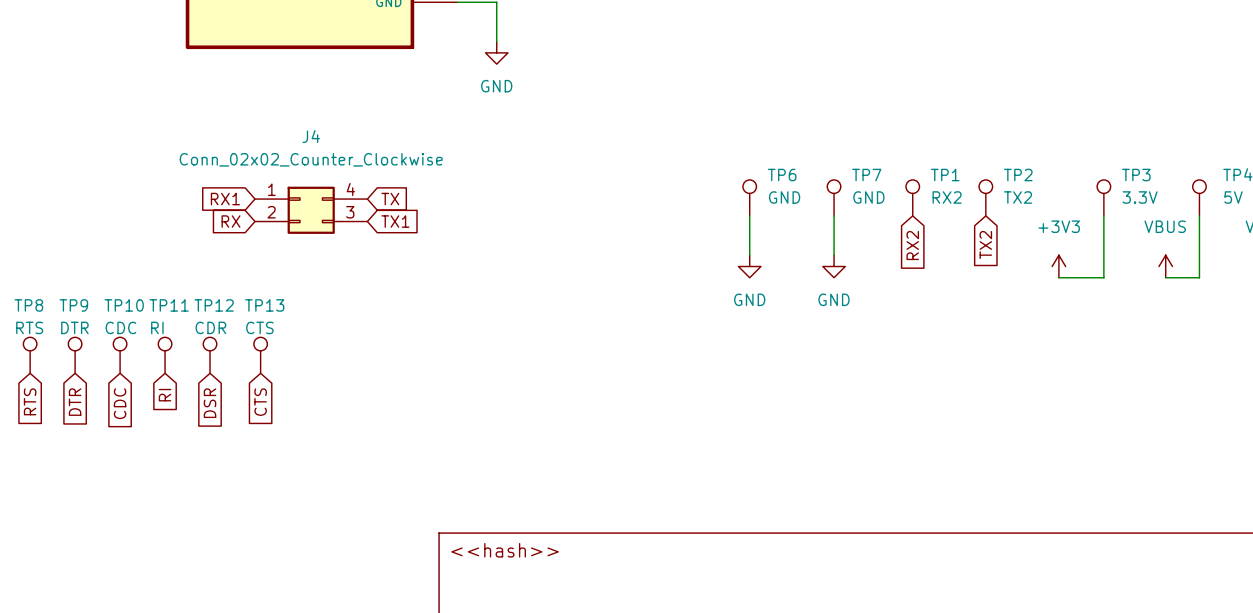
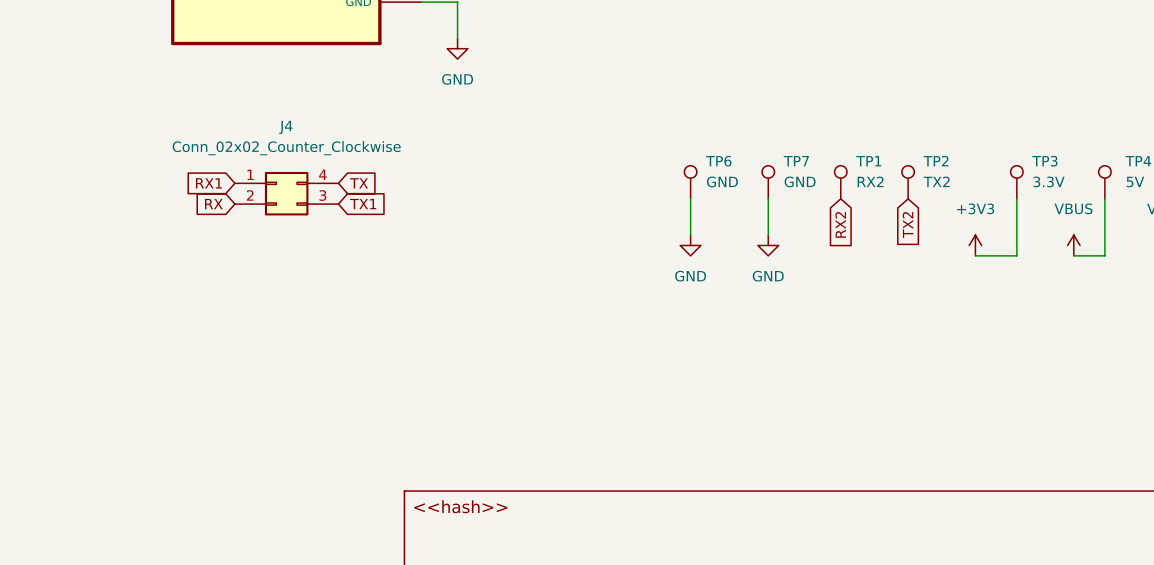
TP8: RTS (30, 355) -> none
TP9: DTR (75, 355) -> none
TP10: CDC (120, 355) -> none
TP11: RI (165, 355) -> none
TP12: CDR (210, 355) -> none
TP13: CTS (260, 355) -> none
global label: RI (165, 395) -> none
global label: RTS (30, 401) -> none
global label: DTR (75, 402) -> none
global label: CTS (260, 402) -> none
global label: CDC (120, 403) -> none
global label: DSR (210, 403) -> none

